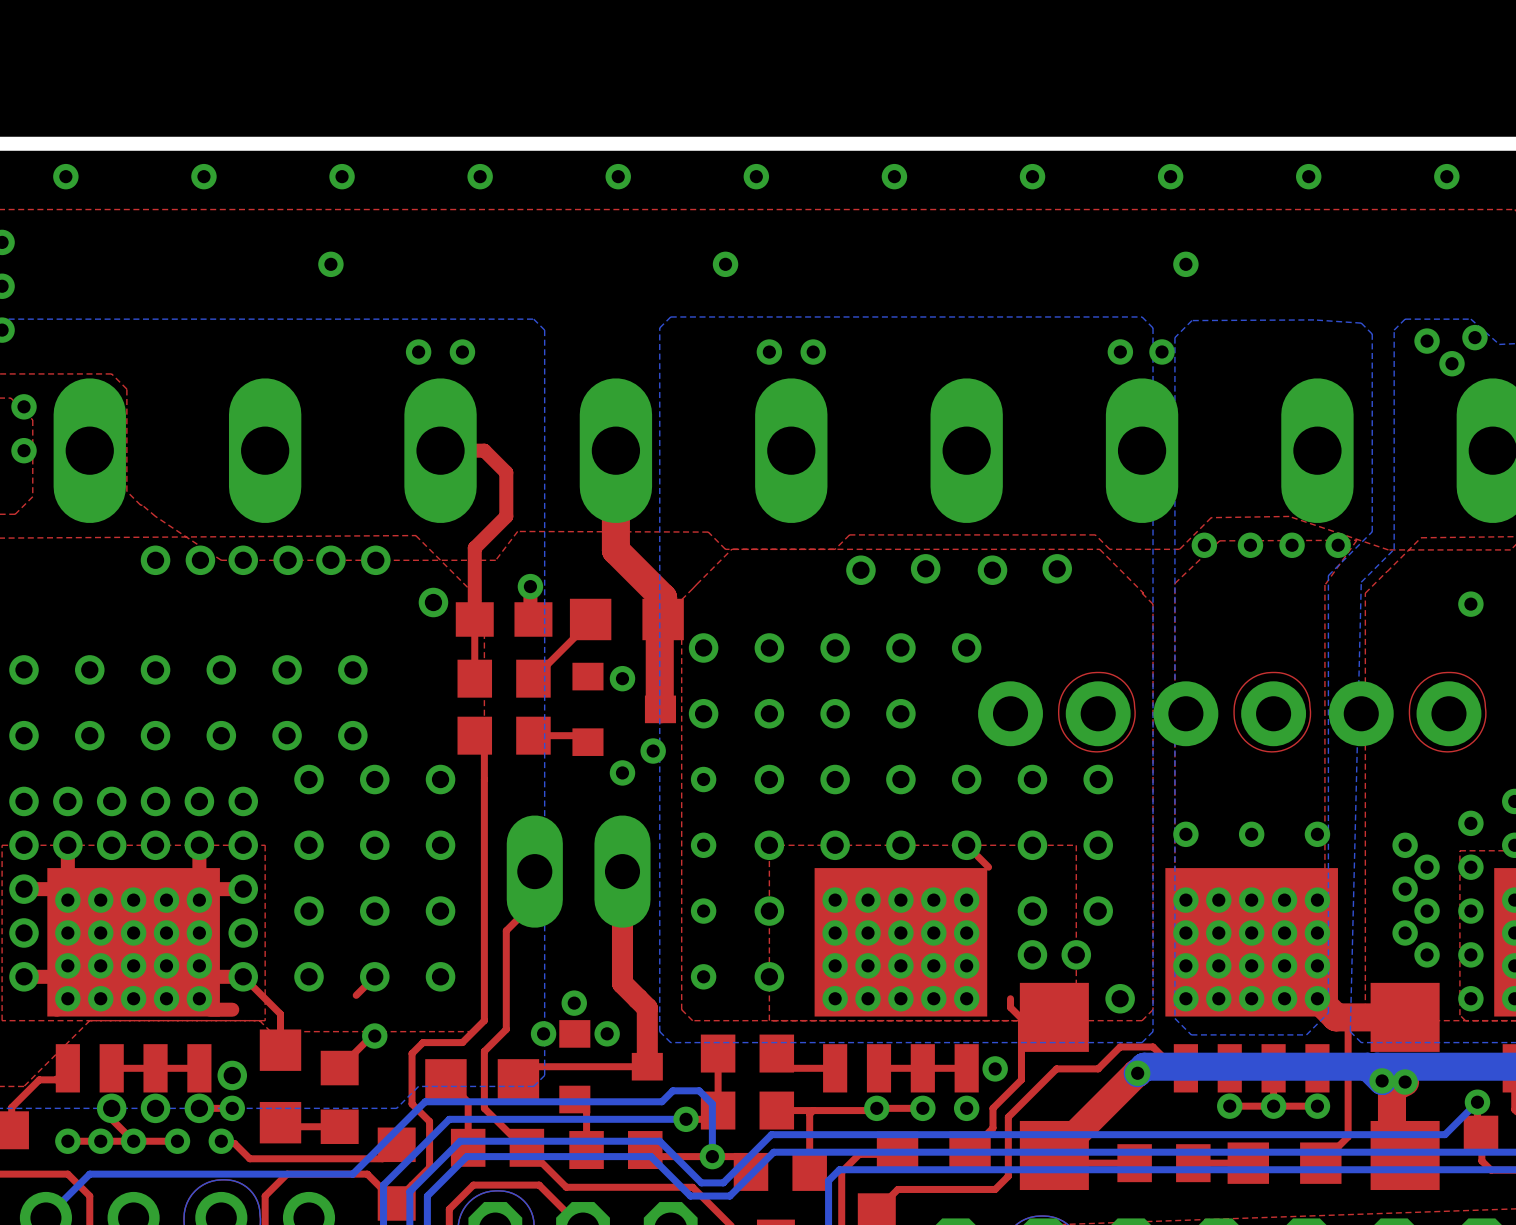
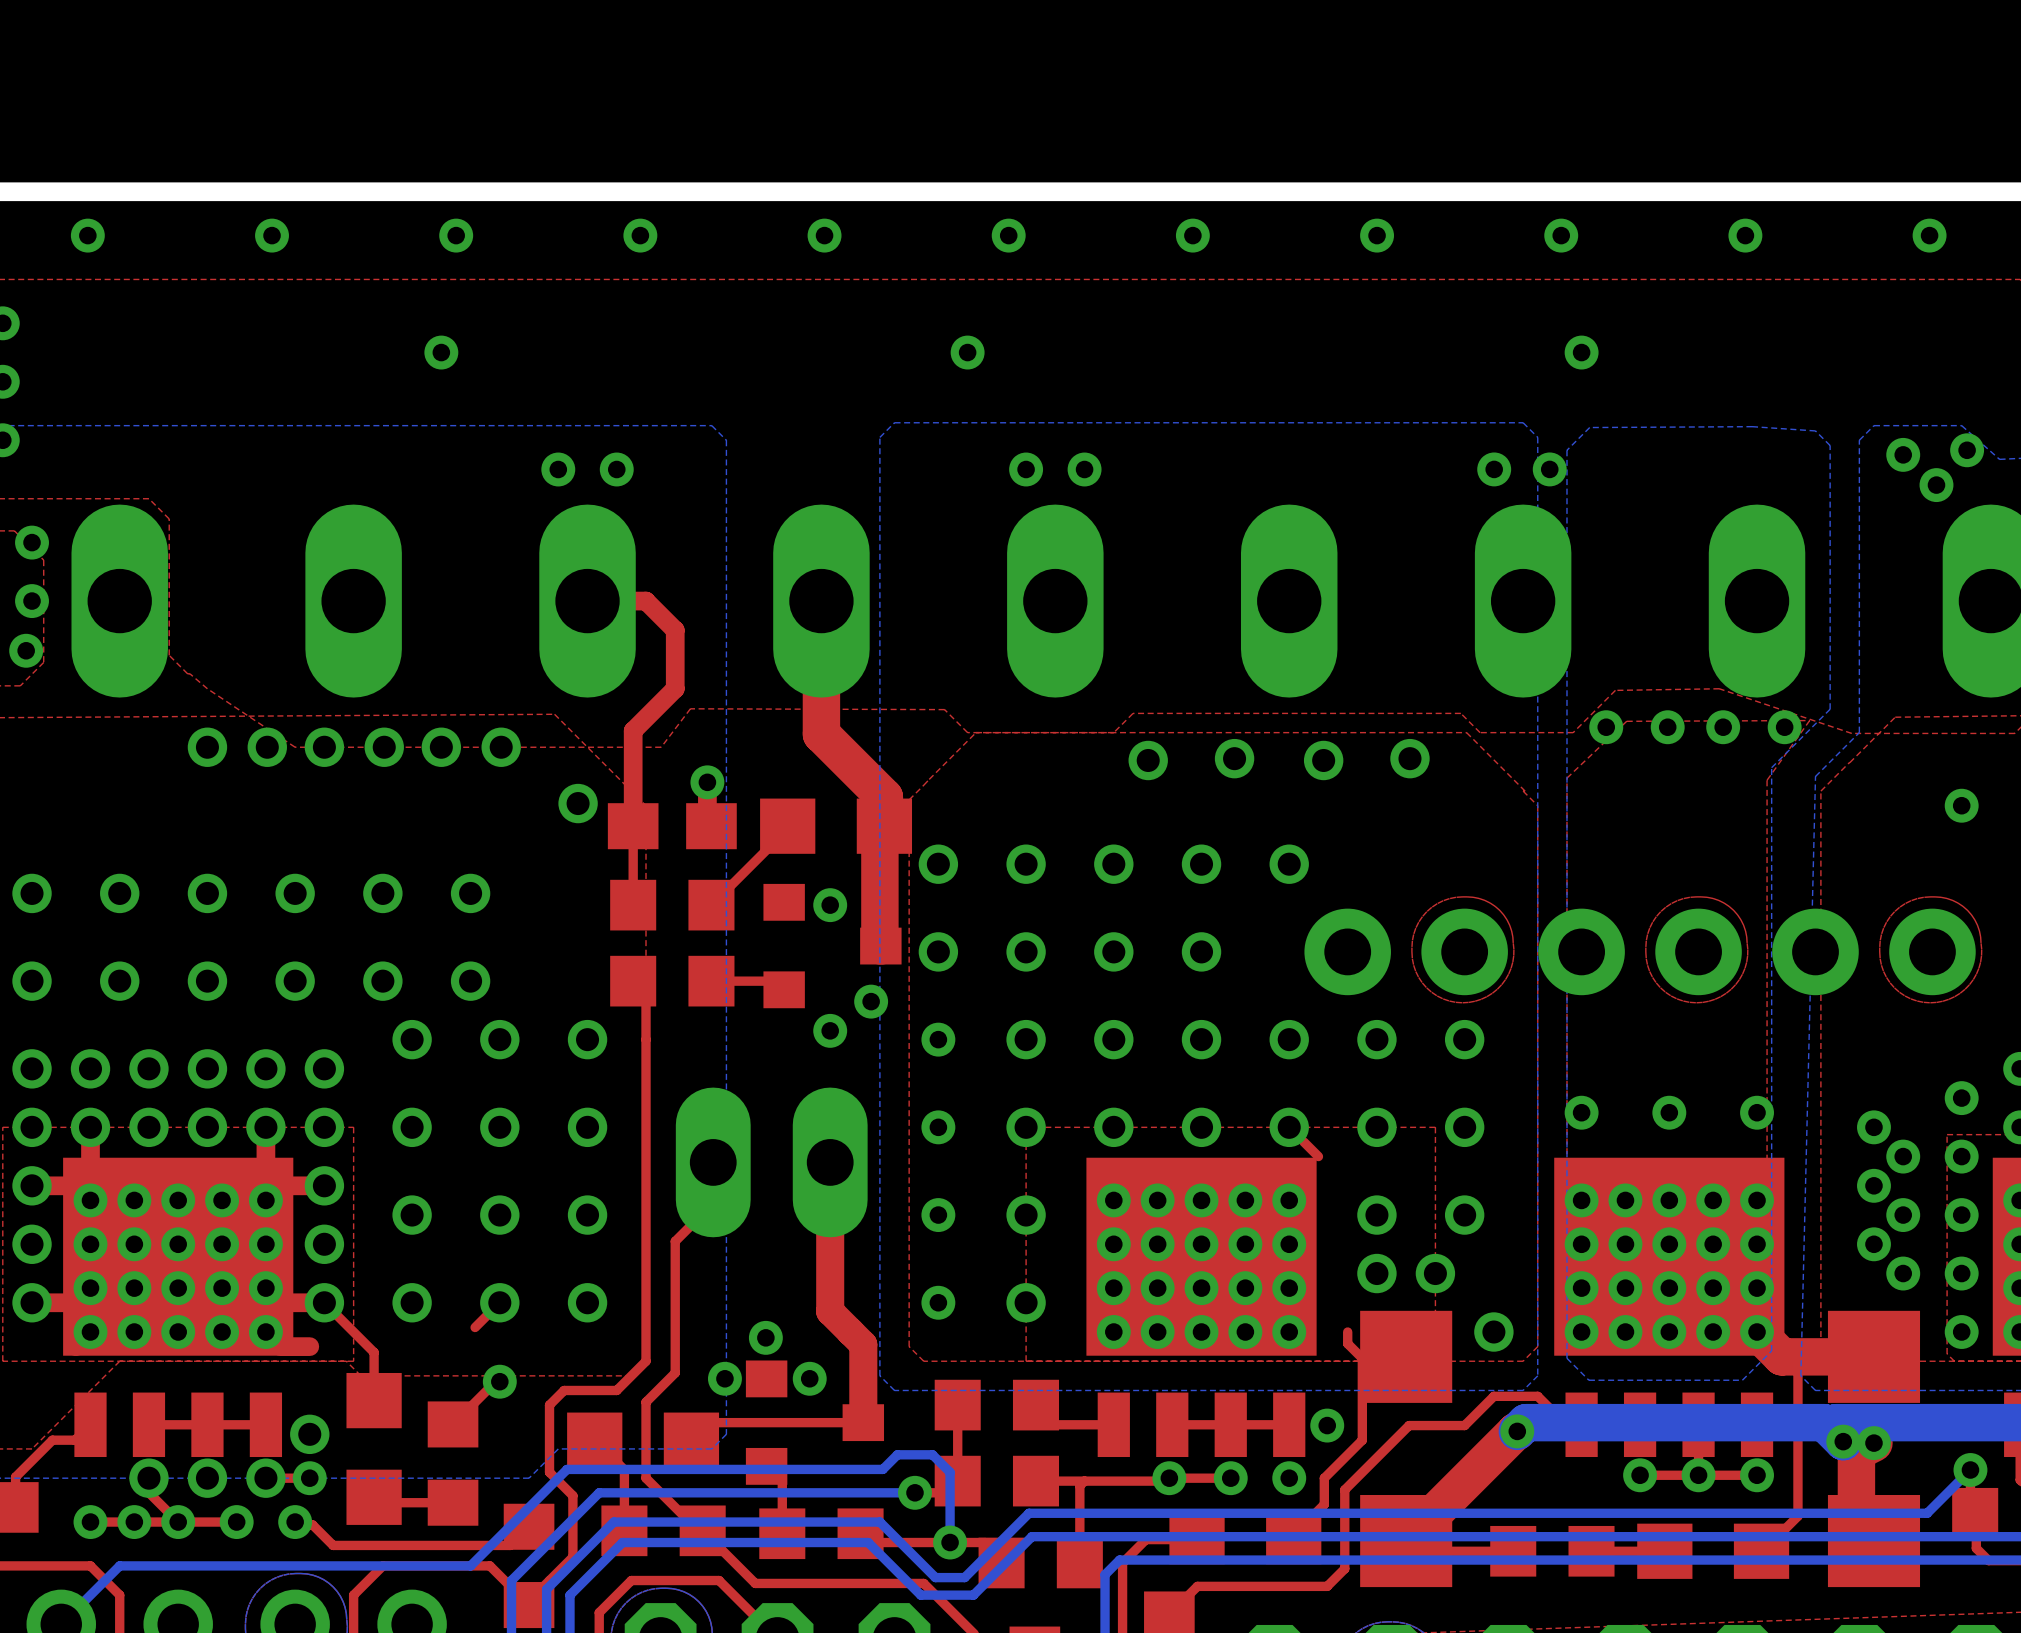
via: none -> (26, 650)

